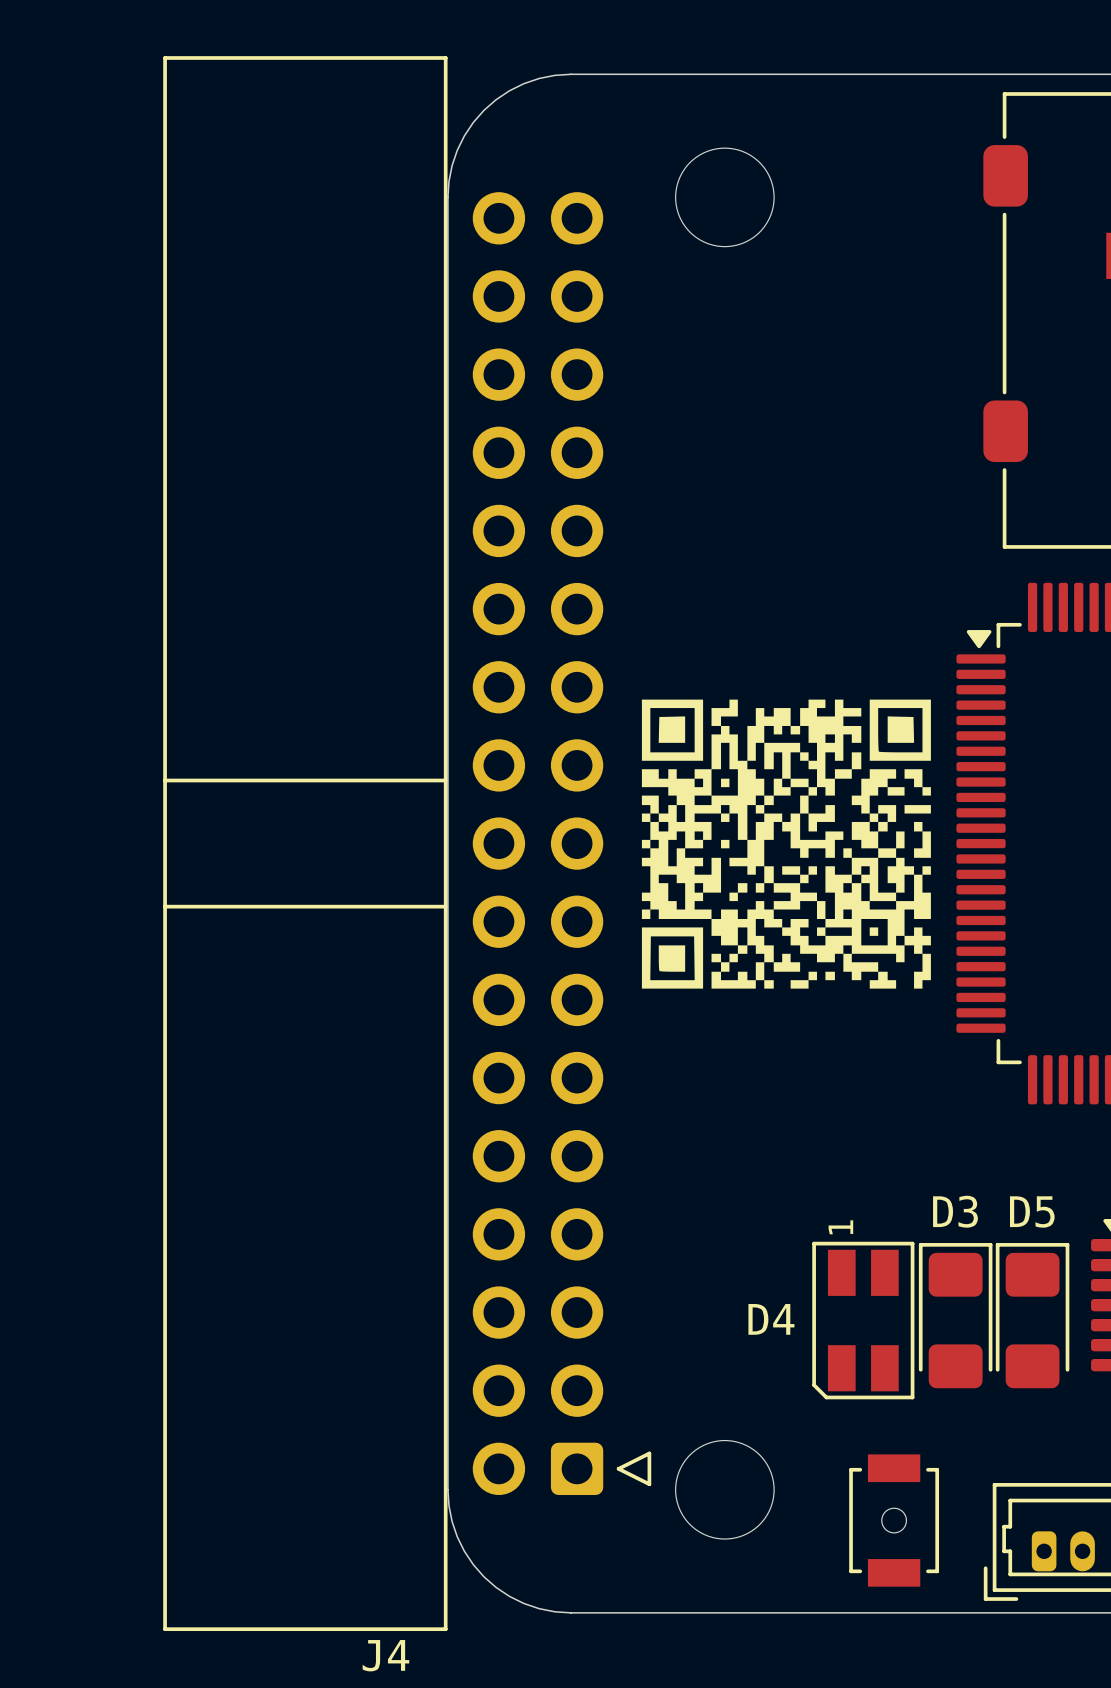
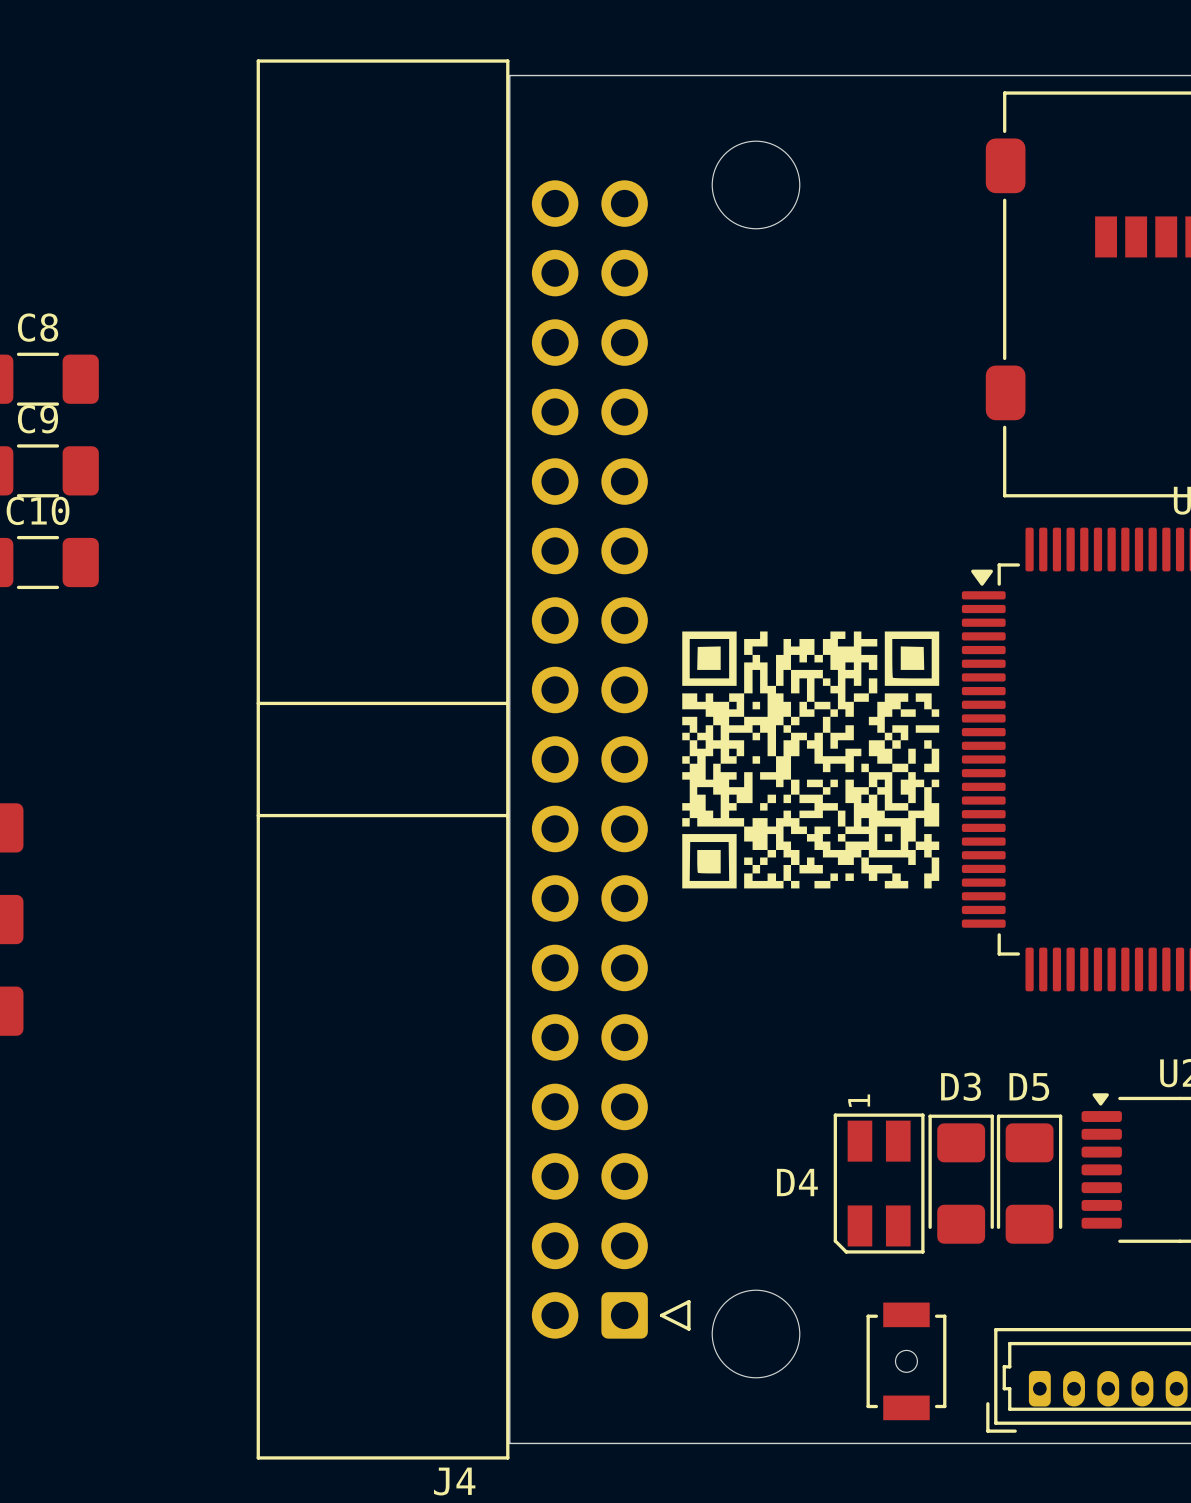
board edge: (571, 74) (539, 78) (523, 83) (496, 99) (483, 110) (473, 122) (457, 150) (452, 165) (447, 197) -> (619, 75) (509, 75) (509, 184)
board edge: (447, 1489) (448, 1505) (457, 1536) (464, 1551) (483, 1576) (509, 1596) (523, 1603) (554, 1611) (571, 1612) -> (509, 1334) (509, 1443) (619, 1443)

